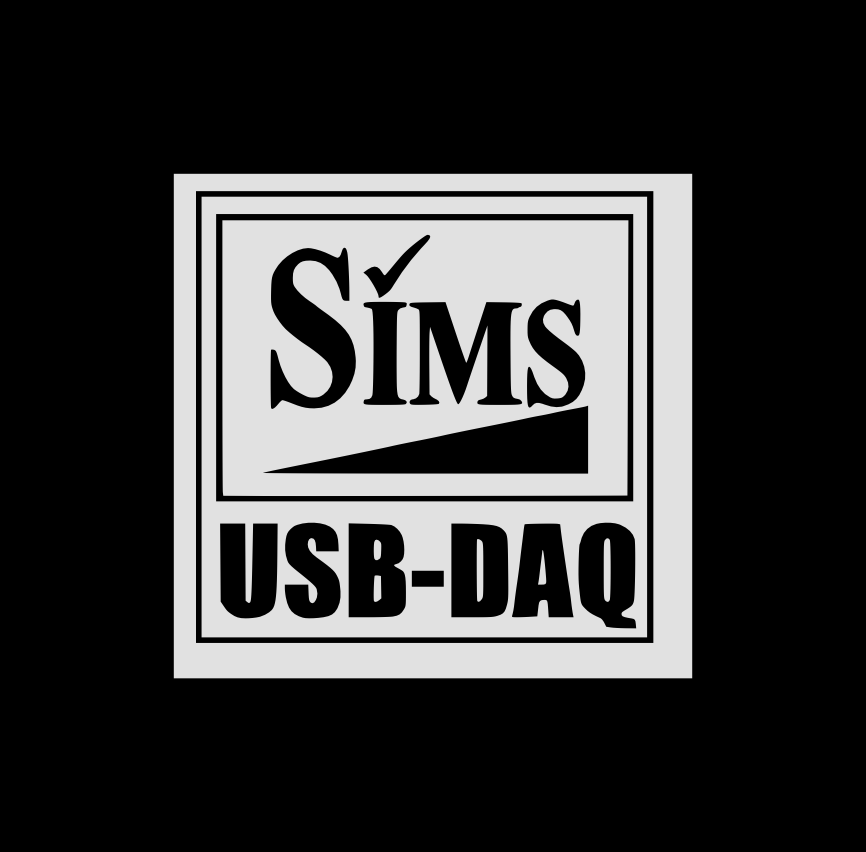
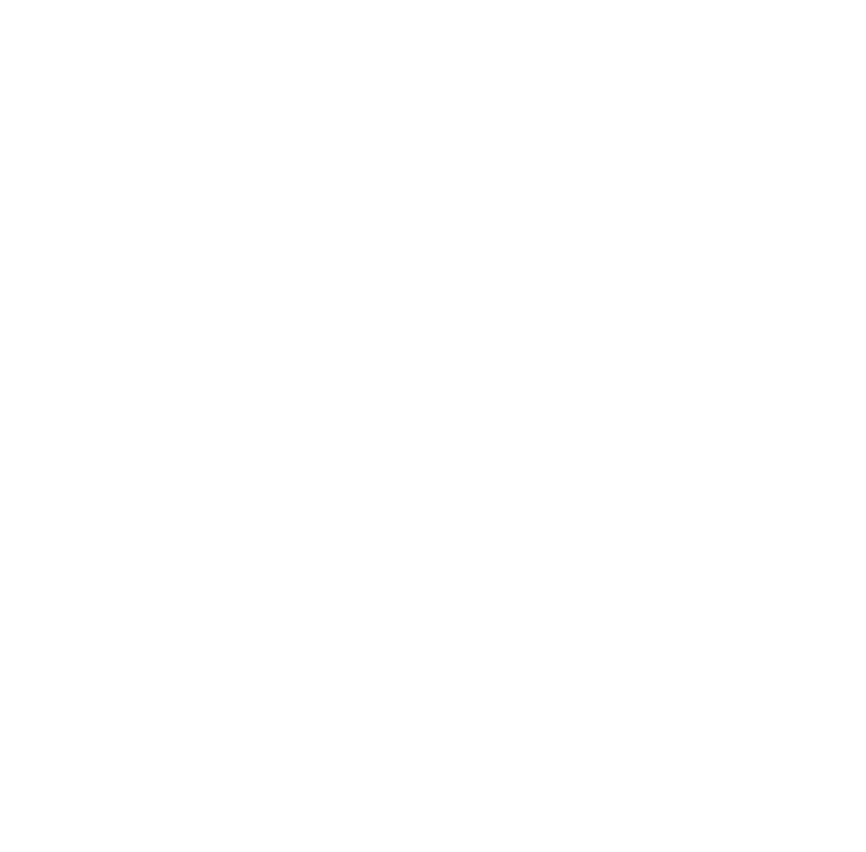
drawing: [173, 173, 693, 679] -> none

